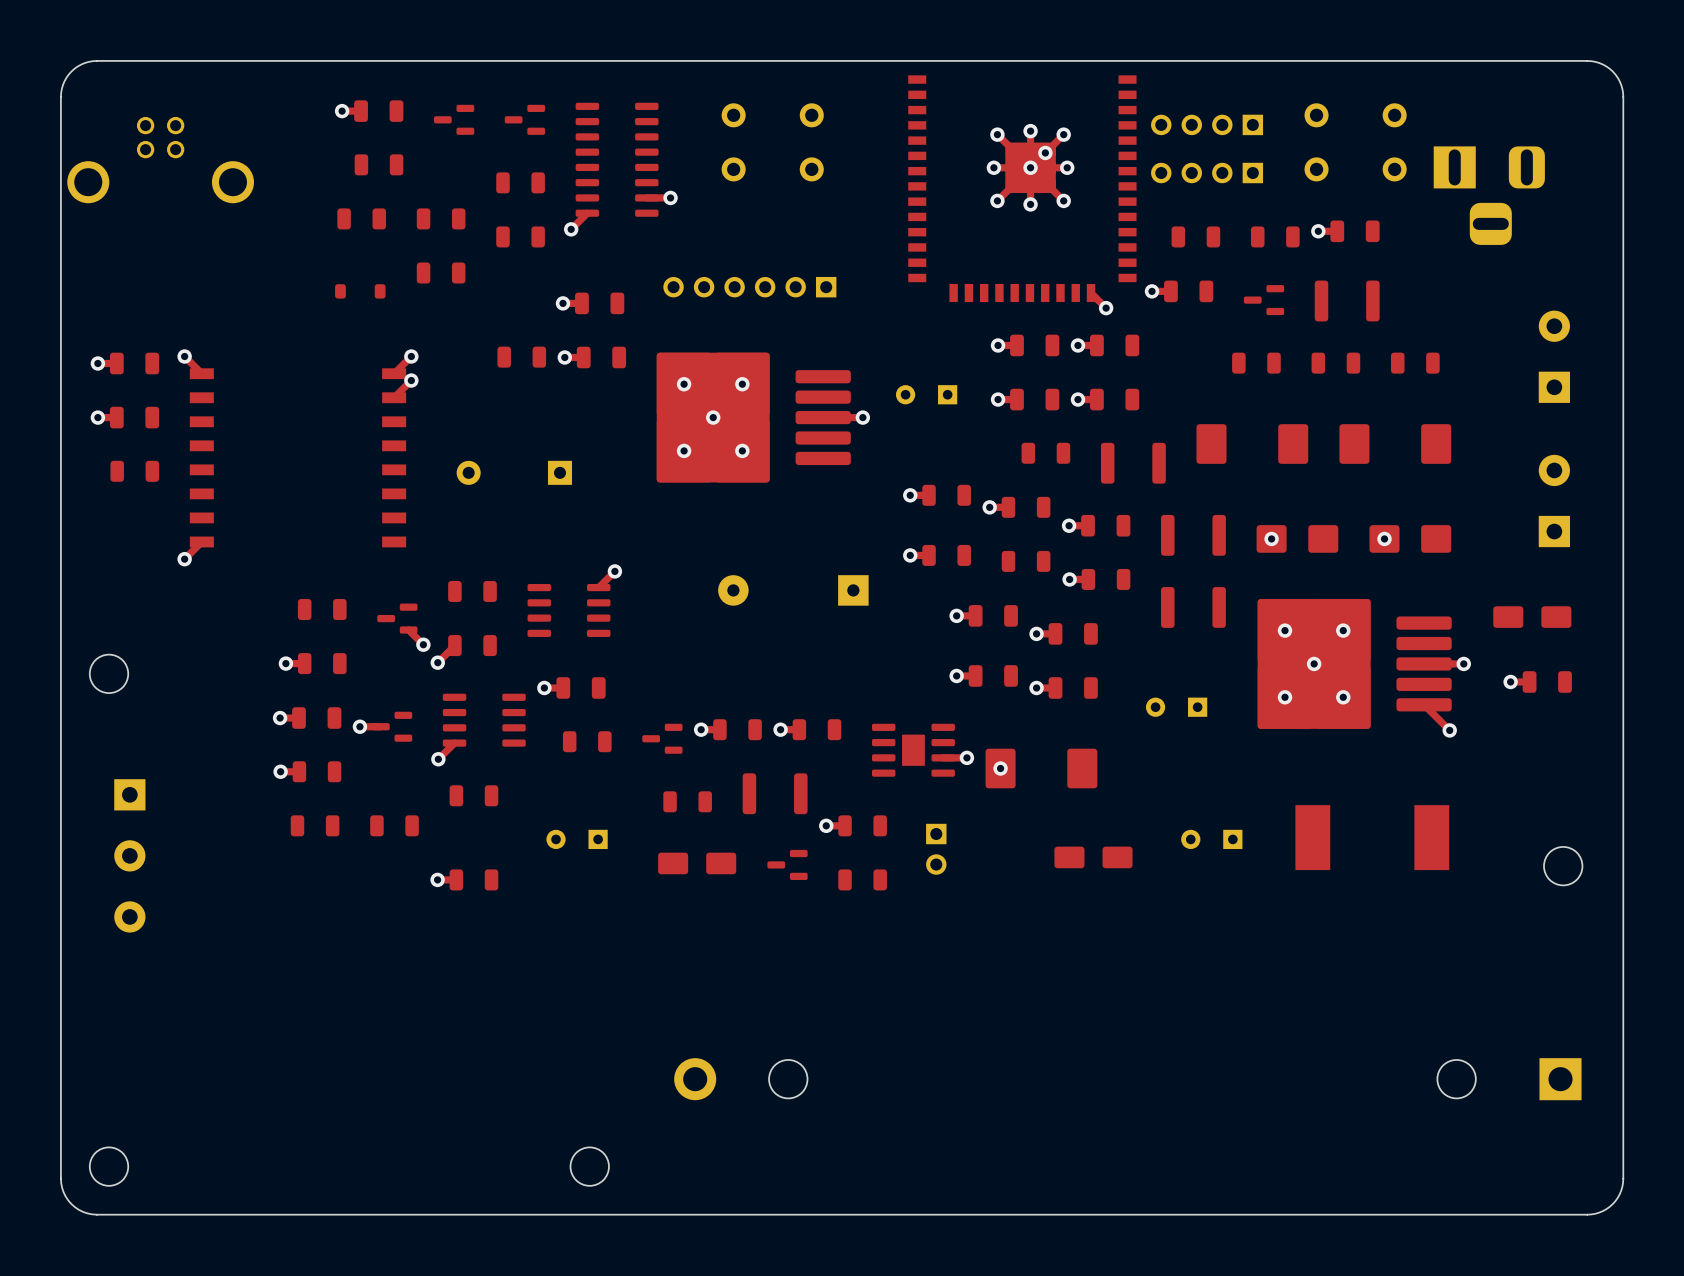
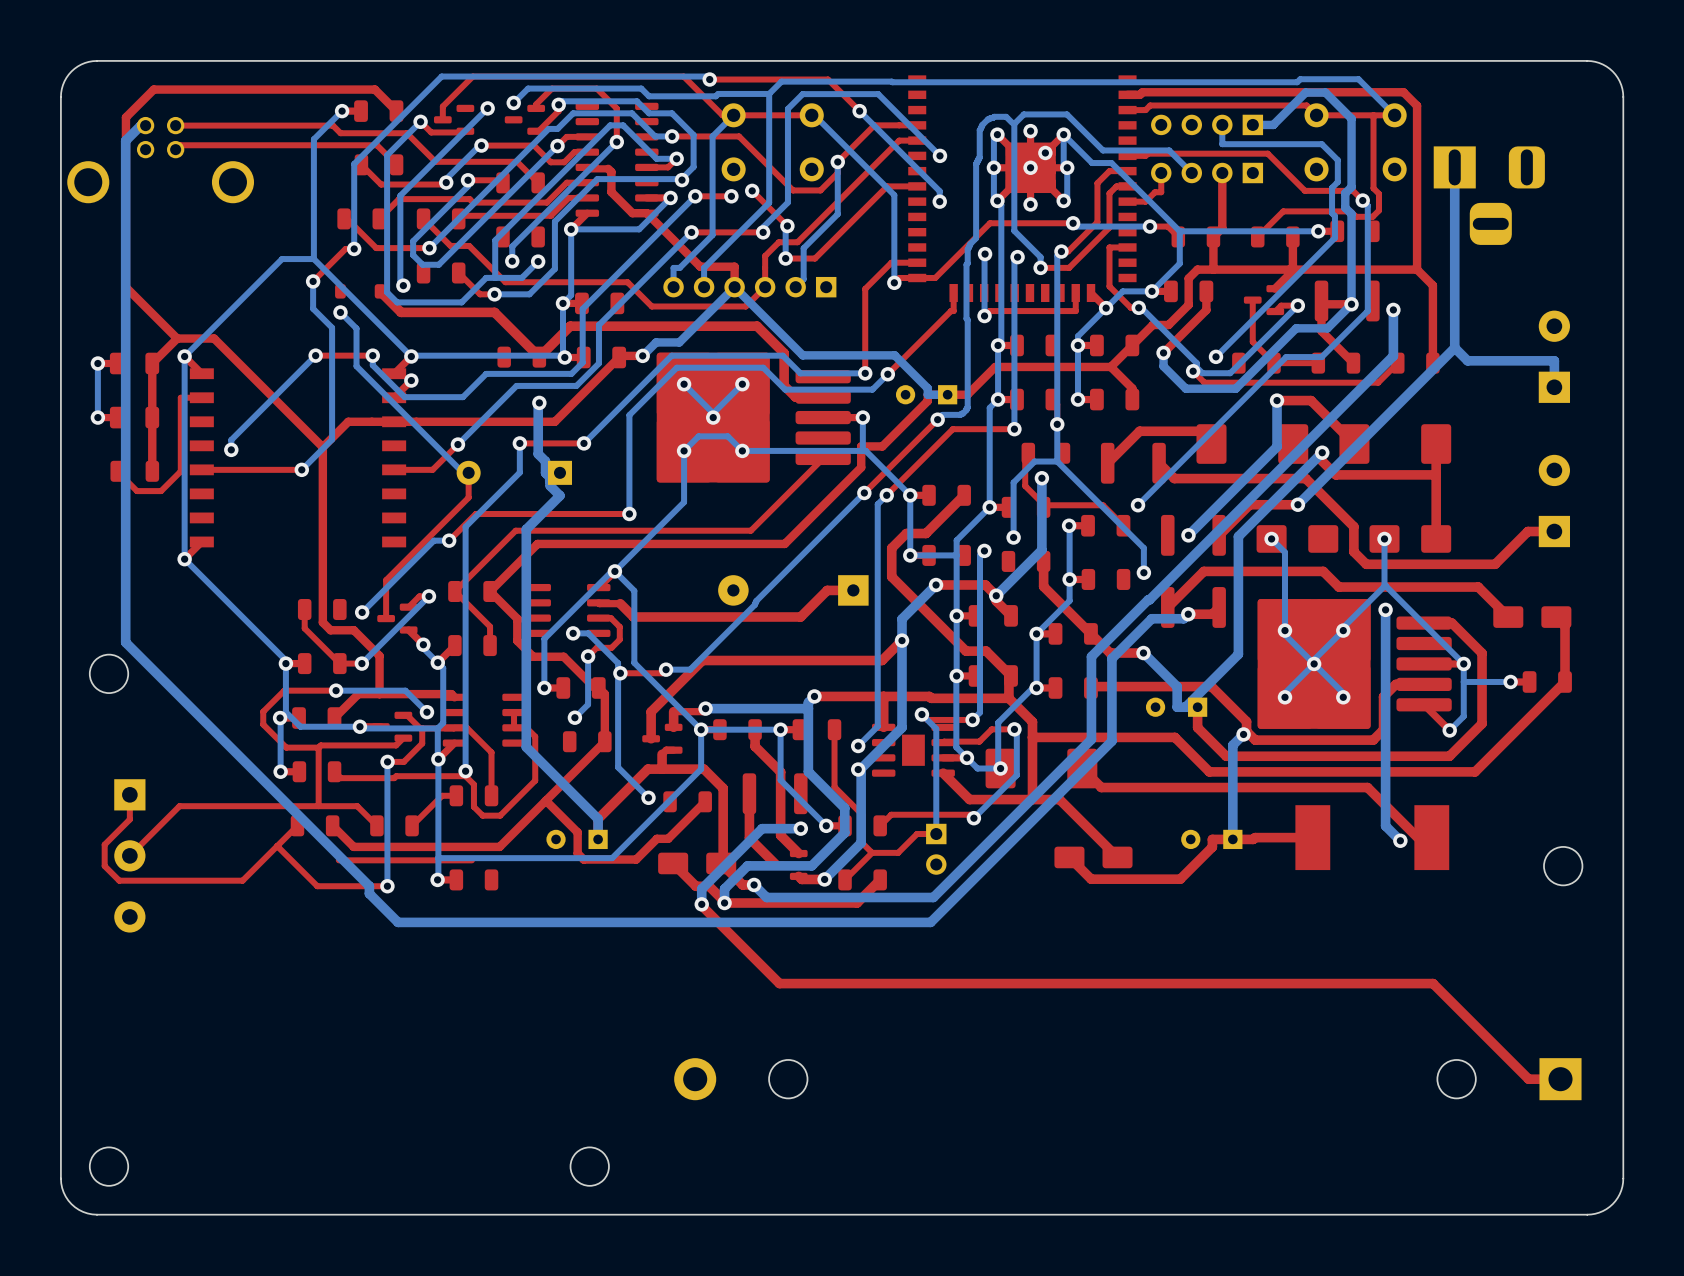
top track: none -> (709, 79) (828, 79) (859, 111)
bottom track: none -> (709, 79) (706, 76) (441, 76) (354, 164) (354, 248)
via: none -> (709, 79)
bottom track: none -> (769, 93) (769, 202) (704, 267) (704, 287)
bottom track: none -> (769, 93) (649, 96) (641, 88) (528, 88) (513, 102)
bottom track: none -> (769, 93) (781, 81) (1297, 82) (1300, 79) (1358, 79) (1394, 115)
top track: none -> (1127, 94) (1139, 94) (1142, 92) (1403, 92) (1417, 105) (1417, 269)
via: none -> (513, 102)
top track: none -> (558, 104) (558, 111) (538, 131) (536, 131)
bottom track: none -> (558, 104) (562, 101) (637, 101) (649, 113) (671, 113) (693, 134) (693, 167) (681, 179)
via: none -> (558, 104)
bottom track: none -> (487, 108) (400, 195) (400, 282) (403, 285)
via: none -> (487, 108)
top track: none -> (536, 108) (536, 104) (551, 88) (596, 88) (616, 108) (616, 142)
top track: none -> (1127, 110) (1145, 110) (1150, 105) (1306, 105) (1316, 115) (1394, 115)
bottom track: none -> (342, 111) (313, 139) (313, 259)
top track: none -> (396, 111) (374, 89) (153, 89) (125, 117) (125, 287) (177, 338)
bottom track: none -> (859, 111) (939, 191) (939, 201)
via: none -> (859, 111)
bottom track: none -> (733, 115) (712, 136) (712, 235) (679, 267) (673, 267) (673, 287)
top track: none -> (811, 115) (722, 115) (683, 76) (472, 76) (442, 106) (442, 119)
bottom track: none -> (811, 115) (814, 115) (894, 195) (894, 282)
top track: none -> (1373, 115) (1373, 188) (1378, 193) (1378, 210) (1372, 216) (1356, 216) (1350, 211) (1283, 211) (1257, 236)
top track: none -> (420, 121) (431, 132) (465, 131)
bottom track: none -> (420, 121) (387, 155) (387, 292) (397, 302) (461, 302) (486, 277) (521, 277) (538, 261)
via: none -> (420, 121)
bottom track: none -> (1012, 122) (1006, 116) (994, 116) (988, 119) (979, 130) (979, 157) (976, 163) (976, 238) (967, 249) (966, 264) (967, 407) (960, 414) (942, 414) (937, 419)
bottom track: none -> (1222, 124) (1222, 144) (1321, 144) (1337, 160) (1337, 182) (1332, 187) (1334, 237) (1215, 356)
bottom track: none -> (1252, 124) (1273, 124) (1305, 92) (1325, 92) (1351, 118) (1351, 187) (1345, 193) (1345, 207) (1351, 214) (1351, 304) (1327, 328) (1296, 328) (1235, 388) (1185, 388) (1163, 366) (1163, 352)
bottom track: none -> (145, 125) (140, 125) (125, 140) (125, 642) (369, 886) (369, 893) (398, 922) (930, 922) (1111, 741) (1111, 658) (1151, 618) (1183, 618) (1188, 614)
top track: none -> (175, 125) (332, 125) (340, 133) (406, 133) (435, 161) (517, 161) (538, 182)
top track: none -> (917, 125) (874, 125) (837, 161) (837, 173) (820, 190) (793, 190) (739, 136) (672, 136)
bottom track: none -> (997, 134) (993, 138) (993, 197) (1001, 204) (1001, 342) (998, 345) (998, 399) (989, 407) (989, 507) (956, 540) (956, 747) (977, 768) (1000, 768) (998, 766) (998, 722) (1032, 687) (1036, 687) (1036, 633) (1069, 600) (1069, 525)
top track: none -> (587, 136) (566, 136) (557, 146)
bottom track: none -> (672, 136) (655, 136) (632, 113) (573, 113) (557, 128) (548, 128) (429, 248)
via: none -> (672, 136)
top track: none -> (917, 140) (899, 140) (797, 242) (778, 242) (765, 256) (765, 287) (745, 306) (651, 306) (627, 282) (505, 282) (469, 245) (450, 245) (423, 218)
bottom track: none -> (616, 142) (512, 246) (512, 261)
via: none -> (616, 142)
top track: none -> (481, 145) (534, 145) (550, 162) (564, 162) (574, 152) (587, 152)
bottom track: none -> (481, 145) (446, 179) (446, 182)
via: none -> (481, 145)
bottom track: none -> (557, 146) (438, 264) (422, 264) (413, 255) (413, 241) (468, 186) (468, 180)
via: none -> (557, 146)
top track: none -> (175, 149) (180, 145) (377, 145) (396, 164)
bottom track: none -> (939, 155) (878, 94) (802, 94) (787, 108) (787, 202) (763, 227) (763, 232)
via: none -> (939, 155)
top track: none -> (1127, 155) (1145, 155) (1147, 153) (1267, 153) (1305, 190) (1353, 190) (1362, 200)
top track: none -> (676, 158) (668, 167) (646, 167)
bottom track: none -> (676, 158) (656, 158) (623, 125) (610, 125) (495, 240) (495, 277)
via: none -> (676, 158)
bottom track: none -> (837, 161) (837, 214) (803, 248) (803, 279) (795, 287)
via: none -> (837, 161)
top track: none -> (361, 164) (381, 184) (444, 184) (446, 182)
top track: none -> (587, 167) (608, 168) (611, 172) (611, 192) (632, 213) (646, 213) (700, 266) (734, 266) (734, 287)
bottom track: none -> (1454, 167) (1454, 347)
top track: none -> (1127, 171) (1109, 171) (1097, 183) (1097, 222) (1068, 251) (1061, 251)
top track: none -> (1161, 173) (1161, 192) (1155, 192) (1145, 201) (1127, 201)
bottom track: none -> (1191, 173) (1169, 150) (1102, 150) (1066, 114) (1023, 114) (1014, 123) (1014, 230) (1040, 257) (1040, 267)
top track: none -> (1222, 173) (1222, 228) (1213, 236) (1213, 269)
bottom track: none -> (681, 179) (597, 179) (554, 221) (554, 268) (529, 294) (494, 294)
top track: none -> (468, 180) (500, 180) (502, 182)
via: none -> (468, 180)
via: none -> (682, 180)
via: none -> (446, 182)
top track: none -> (587, 182) (566, 182) (546, 202) (473, 202) (469, 199) (399, 199) (379, 218)
top track: none -> (917, 186) (887, 186) (815, 258) (785, 258)
top track: none -> (1127, 186) (1116, 186) (1109, 193) (1109, 227) (1069, 267) (1040, 267)
top track: none -> (752, 190) (787, 226)
via: none -> (752, 190)
bottom track: none -> (695, 196) (582, 308) (582, 362) (571, 373) (486, 373) (462, 397) (404, 397) (372, 365) (372, 355)
via: none -> (695, 196)
top track: none -> (731, 196) (695, 196)
via: none -> (731, 196)
top track: none -> (587, 197) (568, 197) (551, 215) (461, 215) (458, 218)
bottom track: none -> (670, 197) (639, 229) (571, 229) (571, 295) (562, 303) (562, 355)
bottom track: none -> (1063, 200) (1067, 197) (1067, 167) (1063, 164) (1063, 134) (1092, 163) (1111, 163) (1179, 231)
bottom track: none -> (1362, 200) (1367, 205) (1367, 311) (1321, 357) (1286, 357) (1138, 505)
via: none -> (1362, 200)
via: none -> (939, 201)
top track: none -> (344, 218) (347, 218) (376, 248) (429, 248)
top track: none -> (1073, 223) (990, 223) (935, 277) (899, 277) (894, 282)
bottom track: none -> (1073, 223) (1076, 226) (1149, 226)
via: none -> (1073, 223)
bottom track: none -> (787, 226) (785, 227) (785, 258)
via: none -> (787, 226)
top track: none -> (1149, 226) (1167, 226) (1178, 236)
via: none -> (1149, 226)
bottom track: none -> (1179, 231) (1179, 263) (1152, 291) (1122, 291) (1077, 336) (1077, 399)
bottom track: none -> (1318, 231) (1179, 231)
bottom track: none -> (691, 232) (598, 325) (598, 363) (576, 385) (516, 385) (457, 444)
via: none -> (691, 232)
top track: none -> (763, 232) (691, 232)
via: none -> (763, 232)
top track: none -> (1292, 236) (1292, 269)
top track: none -> (1127, 247) (1109, 247) (1109, 286) (1130, 307) (1138, 307)
top track: none -> (354, 248) (345, 248) (313, 281)
via: none -> (354, 248)
via: none -> (429, 248)
bottom track: none -> (1061, 251) (1057, 255) (1057, 461)
via: none -> (1061, 251)
bottom track: none -> (985, 254) (984, 316)
via: none -> (985, 254)
bottom track: none -> (1017, 257) (1014, 260) (1014, 429)
via: none -> (1017, 257)
via: none -> (785, 258)
bottom track: none -> (313, 259) (282, 259) (184, 356) (184, 559) (285, 660) (285, 712)
bottom track: none -> (313, 259) (411, 356) (562, 355)
via: none -> (512, 261)
via: none -> (538, 261)
top track: none -> (917, 262) (891, 262) (865, 288) (865, 373)
via: none -> (1040, 267)
top track: none -> (1417, 269) (1432, 285) (1432, 363)
top track: none -> (1417, 269) (1292, 269)
top track: none -> (1291, 271) (1275, 288)
top track: none -> (1291, 271) (1289, 269) (1197, 269) (1188, 278) (1188, 304) (1168, 324) (1152, 324) (1110, 366)
top track: none -> (458, 272) (480, 294) (494, 294)
bottom track: none -> (313, 281) (313, 308) (332, 327) (332, 439) (301, 469)
via: none -> (313, 281)
via: none -> (894, 282)
via: none -> (403, 285)
top track: none -> (380, 291) (401, 312) (494, 312) (539, 357) (570, 326) (757, 326) (784, 353) (784, 385) (795, 397) (823, 397)
top track: none -> (1206, 291) (1206, 310) (1163, 352)
top track: none -> (953, 293) (953, 311) (951, 311) (887, 374)
top track: none -> (1075, 293) (1075, 311) (989, 311) (984, 316)
via: none -> (494, 294)
top track: none -> (1252, 300) (1252, 341) (1274, 363) (1318, 363)
top track: none -> (1351, 304) (1324, 304) (1321, 301) (1321, 331) (1353, 363)
via: none -> (1351, 304)
top track: none -> (1297, 305) (1281, 305) (1275, 311)
bottom track: none -> (1297, 305) (1230, 373) (1202, 373) (1196, 367)
via: none -> (1297, 305)
bottom track: none -> (1138, 307) (1141, 307) (1196, 363) (1196, 367)
via: none -> (1138, 307)
bottom track: none -> (1393, 309) (1393, 356) (1091, 656) (1091, 739) (933, 897) (766, 897) (754, 884)
via: none -> (1393, 309)
bottom track: none -> (340, 312) (356, 328) (356, 366) (463, 472) (468, 472)
via: none -> (340, 312)
via: none -> (984, 316)
top track: none -> (177, 338) (152, 363) (152, 471)
top track: none -> (177, 338) (214, 338) (322, 447)
bottom track: none -> (1454, 347) (1467, 360) (1554, 360) (1554, 387)
bottom track: none -> (1454, 347) (1297, 504)
via: none -> (1163, 352)
bottom track: none -> (315, 355) (231, 440) (231, 449)
via: none -> (315, 355)
top track: none -> (372, 355) (315, 355)
via: none -> (372, 355)
top track: none -> (642, 355) (620, 355) (554, 421) (348, 421) (322, 447)
bottom track: none -> (642, 355) (656, 342) (679, 342) (734, 287) (802, 355) (894, 355) (927, 388) (927, 394) (947, 394)
via: none -> (642, 355)
via: none -> (1215, 356)
bottom track: none -> (97, 363) (97, 417)
top track: none -> (1397, 363) (1378, 382) (1204, 382) (1193, 371)
top track: none -> (1110, 366) (1132, 388) (1132, 399)
top track: none -> (1110, 366) (995, 366) (967, 394) (927, 394) (927, 401) (882, 446) (861, 446) (861, 467) (784, 543) (537, 543) (490, 591) (518, 619) (517, 640) (533, 656) (563, 656) (594, 687) (598, 687) (604, 694) (604, 741) (499, 846) (353, 846) (332, 825)
via: none -> (1193, 371)
bottom track: none -> (865, 373) (800, 373) (782, 355) (671, 355) (583, 443)
via: none -> (865, 373)
bottom track: none -> (887, 374) (872, 389) (785, 389) (763, 367) (676, 367) (629, 415) (629, 513)
via: none -> (887, 374)
bottom track: none -> (742, 384) (713, 413) (684, 384)
top track: none -> (201, 397) (180, 397) (180, 471) (161, 491) (137, 491) (117, 471)
top track: none -> (1277, 400) (1311, 400) (1354, 444)
bottom track: none -> (1277, 400) (1277, 446) (1188, 535)
via: none -> (1277, 400)
bottom track: none -> (539, 402) (538, 454) (545, 461) (545, 473) (549, 477) (550, 485) (559, 495) (526, 529) (526, 747) (598, 818) (598, 839)
via: none -> (539, 402)
bottom track: none -> (862, 417) (862, 450)
top track: none -> (937, 419) (864, 492)
via: none -> (937, 419)
via: none -> (1057, 424)
top track: none -> (1014, 429) (952, 429) (886, 495)
via: none -> (1014, 429)
bottom track: none -> (519, 443) (519, 472) (465, 526) (465, 771)
via: none -> (519, 443)
top track: none -> (583, 443) (519, 443)
via: none -> (583, 443)
top track: none -> (457, 444) (432, 469) (394, 469)
via: none -> (457, 444)
top track: none -> (1211, 444) (1198, 431) (1139, 431) (1107, 463)
top track: none -> (1436, 444) (1436, 538)
top track: none -> (322, 447) (322, 622) (330, 630) (353, 630) (379, 655) (379, 694)
via: none -> (231, 449)
top track: none -> (1322, 452) (1317, 456) (1335, 474) (1436, 474)
bottom track: none -> (1322, 452) (1238, 536) (1238, 654) (1185, 707)
via: none -> (1322, 452)
top track: none -> (1028, 453) (1025, 456) (1025, 485) (1044, 505)
top track: none -> (823, 458) (750, 530) (515, 530) (454, 591) (490, 626) (490, 645)
bottom track: none -> (1057, 461) (1143, 548) (1143, 572)
bottom track: none -> (1057, 461) (1034, 461) (1013, 482) (1013, 537)
top track: none -> (1159, 463) (1174, 478) (1305, 478) (1353, 526) (1353, 551) (1366, 564) (1495, 564) (1527, 531) (1554, 531)
top track: none -> (301, 469) (201, 469)
via: none -> (301, 469)
top track: none -> (468, 472) (468, 497) (386, 580) (386, 618)
bottom track: none -> (1041, 478) (1041, 550) (996, 595)
via: none -> (1041, 478)
bottom track: none -> (864, 492) (690, 669) (666, 669)
via: none -> (864, 492)
bottom track: none -> (886, 495) (877, 504) (877, 726) (858, 746)
via: none -> (886, 495)
top track: none -> (964, 495) (926, 533) (906, 533) (891, 548) (891, 576) (966, 651) (986, 651) (1011, 675) (1008, 678) (1008, 698)
top track: none -> (1297, 504) (1249, 504) (1219, 535)
via: none -> (1297, 504)
top track: none -> (1044, 505) (1103, 505) (1123, 525)
via: none -> (1138, 505)
top track: none -> (629, 513) (475, 513) (449, 540)
via: none -> (629, 513)
via: none -> (1188, 535)
via: none -> (1013, 537)
bottom track: none -> (1271, 538) (1284, 552) (1284, 634) (1343, 693) (1343, 697)
bottom track: none -> (1384, 538) (1384, 586)
bottom track: none -> (449, 540) (433, 540) (362, 612)
via: none -> (449, 540)
bottom track: none -> (984, 550) (979, 555) (979, 712) (972, 719)
via: none -> (984, 550)
bottom track: none -> (956, 555) (910, 555) (910, 495) (865, 450) (742, 450) (727, 436) (698, 436) (684, 450) (684, 502) (614, 571)
top track: none -> (1043, 561) (1043, 586) (1110, 653) (1143, 653)
bottom track: none -> (614, 571) (634, 590) (634, 662) (701, 729)
bottom track: none -> (614, 571) (611, 571) (544, 638) (544, 687)
via: none -> (1143, 572)
top track: none -> (936, 585) (985, 585) (996, 595) (996, 601) (1011, 615)
bottom track: none -> (936, 585) (902, 619) (902, 727) (858, 769) (861, 772) (861, 842) (824, 879)
via: none -> (936, 585)
bottom track: none -> (1384, 586) (1463, 663) (1463, 716) (1449, 730)
bottom track: none -> (1384, 586) (1314, 659) (1314, 663) (1284, 693) (1284, 697)
top track: none -> (853, 590) (827, 590) (800, 616) (633, 616) (620, 603) (598, 602)
via: none -> (996, 595)
top track: none -> (428, 596) (419, 596) (408, 607)
bottom track: none -> (428, 596) (361, 663)
via: none -> (428, 596)
top track: none -> (1167, 607) (1203, 571) (1323, 571) (1338, 587) (1478, 587) (1508, 617)
top track: none -> (1219, 607) (1212, 614) (1188, 614)
top track: none -> (304, 609) (304, 628) (339, 663) (361, 663)
bottom track: none -> (1385, 609) (1385, 826) (1400, 840)
via: none -> (1385, 609)
via: none -> (362, 612)
via: none -> (1188, 614)
top track: none -> (1556, 617) (1565, 625) (1565, 681) (1475, 771) (1209, 771) (1174, 737) (1032, 737)
top track: none -> (598, 618) (610, 618) (619, 627) (619, 639) (611, 647) (596, 647) (588, 656)
top track: none -> (1424, 623) (1451, 623) (1482, 653) (1482, 723) (1449, 756) (1226, 756) (1197, 727) (1197, 707)
bottom track: none -> (573, 633) (588, 633) (618, 663) (618, 767) (648, 797)
via: none -> (573, 633)
top track: none -> (902, 640) (882, 660) (702, 660) (651, 711) (651, 738)
via: none -> (902, 640)
bottom track: none -> (423, 644) (423, 648) (443, 668) (443, 723) (437, 728)
bottom track: none -> (1143, 653) (1177, 686) (1177, 707) (1197, 707)
via: none -> (1143, 653)
bottom track: none -> (588, 656) (588, 704) (574, 717)
via: none -> (588, 656)
via: none -> (361, 663)
top track: none -> (666, 669) (662, 673) (620, 673)
via: none -> (666, 669)
via: none -> (620, 673)
bottom track: none -> (1510, 681) (1463, 681)
top track: none -> (1424, 684) (1395, 684) (1383, 696) (1383, 729) (1373, 740) (1255, 740) (1246, 731)
top track: none -> (1090, 687) (1211, 686) (1246, 721) (1246, 731)
top track: none -> (336, 690) (284, 690) (263, 711) (263, 724) (286, 747) (318, 747)
bottom track: none -> (336, 690) (405, 690) (426, 712)
via: none -> (336, 690)
top track: none -> (814, 696) (1008, 698)
bottom track: none -> (814, 696) (808, 702) (808, 771) (844, 808) (844, 832) (811, 865) (747, 865) (724, 888) (724, 903)
via: none -> (814, 696)
top track: none -> (883, 696) (883, 727)
top track: none -> (454, 697) (451, 694) (358, 694) (334, 718)
top track: none -> (1008, 698) (1032, 721) (1032, 799)
top track: none -> (705, 708) (702, 711) (673, 711) (673, 727)
via: none -> (705, 708)
bottom track: none -> (808, 708) (705, 708)
bottom track: none -> (285, 712) (280, 718) (280, 771)
bottom track: none -> (285, 712) (300, 726) (437, 728)
via: none -> (426, 712)
top track: none -> (514, 712) (514, 727) (526, 727) (535, 736) (535, 780) (500, 815) (482, 815) (473, 806) (473, 784) (465, 776)
top track: none -> (921, 714) (927, 719) (972, 719)
bottom track: none -> (921, 714) (936, 728) (936, 834)
via: none -> (921, 714)
top track: none -> (403, 715) (407, 715) (420, 728) (466, 727) (491, 752) (491, 795)
via: none -> (574, 717)
via: none -> (972, 719)
top track: none -> (422, 728) (422, 743) (403, 761) (387, 761)
bottom track: none -> (437, 728) (437, 879)
bottom track: none -> (701, 729) (780, 729) (780, 780) (826, 825)
bottom track: none -> (701, 729) (701, 769) (612, 858) (438, 858)
top track: none -> (755, 729) (755, 746) (780, 772) (780, 835) (798, 853)
top track: none -> (834, 729) (834, 787) (862, 815) (862, 843) (872, 852)
top track: none -> (1014, 729) (991, 729) (979, 741) (943, 742)
bottom track: none -> (1014, 729) (1016, 731) (1016, 775) (973, 818)
via: none -> (1014, 729)
bottom track: none -> (1243, 734) (1232, 745) (1232, 839)
via: none -> (1243, 734)
top track: none -> (403, 738) (396, 745) (320, 745) (318, 747)
via: none -> (858, 746)
top track: none -> (318, 747) (318, 806)
top track: none -> (673, 750) (666, 750) (662, 754) (662, 769)
via: none -> (387, 761)
bottom track: none -> (387, 762) (387, 886)
top track: none -> (1082, 768) (1101, 787) (1367, 787) (1417, 837)
via: none -> (858, 769)
top track: none -> (334, 771) (340, 778) (465, 776)
via: none -> (465, 771)
top track: none -> (943, 773) (969, 799) (1059, 799) (1117, 857)
top track: none -> (749, 793) (749, 838) (776, 864)
top track: none -> (129, 794) (129, 819) (104, 844) (104, 866) (119, 880) (242, 880) (297, 825)
top track: none -> (456, 795) (442, 795) (412, 825)
via: none -> (648, 797)
top track: none -> (545, 800) (577, 832) (577, 853) (583, 859) (636, 859) (656, 838) (668, 838) (705, 801)
top track: none -> (973, 818) (970, 814) (891, 814) (880, 825)
via: none -> (973, 818)
top track: none -> (376, 825) (357, 806) (179, 806) (129, 855)
bottom track: none -> (800, 828) (762, 828) (701, 889) (701, 904)
via: none -> (800, 828)
top track: none -> (936, 834) (917, 834) (898, 852) (872, 852)
top track: none -> (1312, 837) (1212, 839) (1212, 847) (1180, 879) (1091, 879) (1069, 857)
top track: none -> (598, 839) (598, 818) (647, 769) (703, 769) (723, 788) (723, 861) (721, 863) (742, 884) (754, 884)
via: none -> (1400, 840)
top track: none -> (277, 846) (317, 886) (387, 886)
top track: none -> (872, 852) (845, 879)
top track: none -> (471, 860) (338, 860)
top track: none -> (673, 863) (696, 886) (709, 886) (724, 903) (857, 903) (880, 879)
top track: none -> (798, 876) (801, 879) (824, 879)
via: none -> (824, 879)
via: none -> (754, 884)
via: none -> (387, 886)
via: none -> (724, 903)
top track: none -> (701, 904) (779, 983) (1433, 983) (1528, 1079) (1560, 1079)
via: none -> (701, 904)

